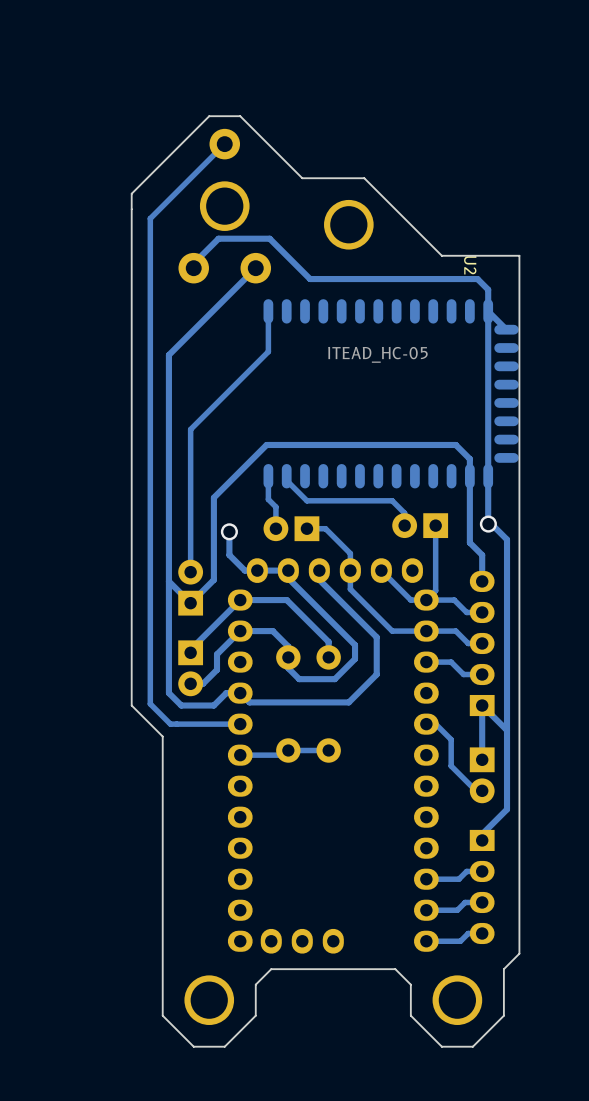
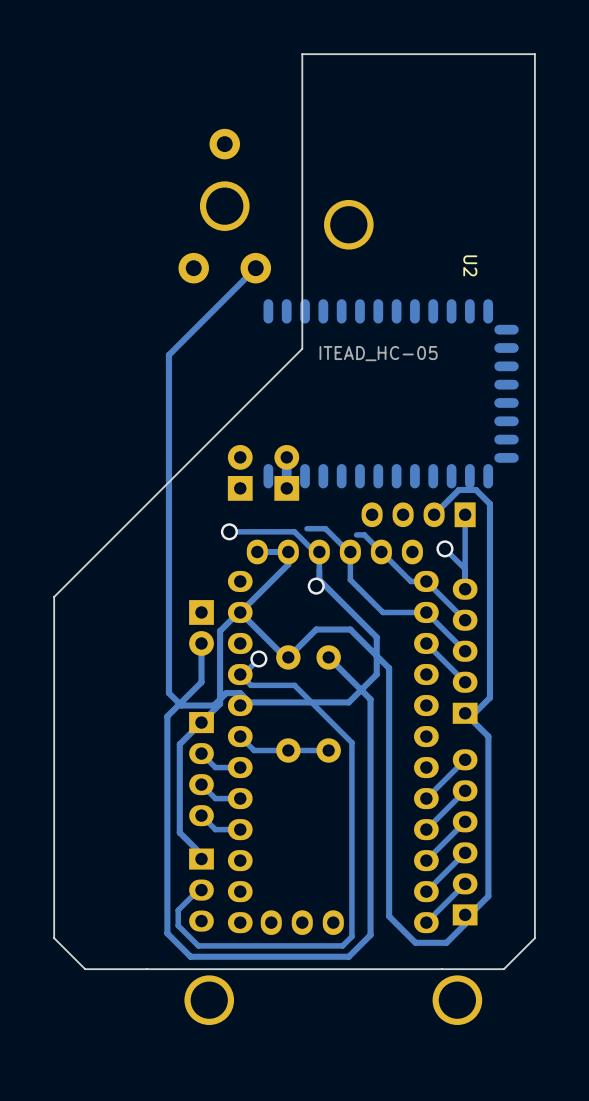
track: (224, 144) (150, 218) (150, 703) (170, 724) (240, 724) -> none
track: (193, 268) (193, 263) (218, 238) (269, 238) (310, 279) (477, 279) (488, 289) (488, 523) (491, 524) (507, 539) (507, 809) (482, 834) (482, 840) -> none
track: (268, 311) (268, 351) (190, 429) (190, 572) -> none
track: (488, 311) (506, 329) -> none
part: none -> (240, 472)
part: none -> (286, 472)
track: (268, 476) (268, 499) (275, 507) (275, 528) -> none
track: (286, 476) (286, 480) (306, 500) (392, 500) (404, 513) (404, 525) -> none
part footprint: [392, 513, 449, 539] -> [361, 502, 476, 528]
track: none -> (434, 514) (458, 489) (475, 489) (489, 503) (489, 697) (474, 713) (465, 713) (488, 736) (488, 896) (469, 914) (465, 914) (465, 924) (446, 942) (415, 942) (389, 916) (389, 668) (350, 629) (316, 629) (288, 657) (285, 657) (240, 612) (288, 564) (288, 551) (257, 551)
track: none -> (465, 514) (465, 589)
via position: (488, 524) -> (444, 548)
track: (435, 525) (435, 590) (426, 600) -> none
part: (291, 528) -> none
track: none -> (226, 531) (294, 531) (314, 551) (319, 551) (319, 570)
track: (229, 531) (229, 555) (244, 570) (288, 570) (288, 578) (355, 645) (355, 659) (334, 679) (299, 679) (288, 668) (288, 646) (272, 631) (240, 631) (217, 654) (217, 669) (203, 683) (190, 683) -> none
track: none -> (356, 534) (364, 534) (410, 581) (426, 581) (465, 620)
track: none -> (444, 548) (465, 569)
track: (381, 570) (410, 600) (454, 600) (466, 612) (482, 612) -> none
track: (350, 579) (350, 589) (392, 631) (455, 631) (468, 643) (482, 643) -> (350, 579) (382, 612) (426, 612) (465, 651)
track: (482, 581) (482, 555) (469, 542) (469, 459) (455, 444) (266, 444) (213, 497) (213, 579) (190, 603) (168, 581) -> none
via: none -> (316, 586)
part: (190, 587) -> none
track: none -> (238, 612) (220, 631) (220, 703) (179, 744) (179, 832) (201, 854) (201, 859)
part: none -> (201, 627)
track: none -> (426, 643) (465, 682)
part position: (482, 643) -> (465, 651)
track: (190, 652) (190, 649) (240, 600) (286, 600) (328, 641) (328, 657) -> (201, 643) (201, 682) (167, 716) (167, 933) (190, 956) (348, 956) (370, 935) (370, 699) (328, 657)
track: none -> (258, 659) (243, 674) (240, 674) (251, 685) (294, 685) (351, 742) (351, 936) (342, 945) (198, 945) (178, 925) (178, 910) (198, 890) (201, 890)
via: none -> (258, 659)
track: (426, 662) (451, 662) (463, 674) (482, 674) -> none
part: (190, 668) -> none
track: (426, 724) (435, 724) (451, 739) (451, 766) (475, 790) (482, 790) -> none
track: (507, 730) (482, 705) (482, 759) -> none
track: (288, 750) (283, 755) (240, 755) -> (288, 750) (254, 750) (240, 736)
track: none -> (201, 753) (215, 767) (240, 767)
part position: (333, 755) -> (333, 737)
track: none -> (465, 759) (426, 798)
part: (482, 775) -> none
track: none -> (201, 784) (215, 798) (240, 798)
track: none -> (465, 790) (426, 829)
track: none -> (201, 815) (215, 829) (240, 829)
track: none -> (465, 821) (426, 860)
part: none -> (465, 837)
track: none -> (465, 852) (426, 891)
track: (482, 871) (466, 871) (458, 879) (426, 879) -> none
track: none -> (465, 883) (426, 922)
part position: (482, 886) -> (201, 769)
part: none -> (201, 890)
track: (482, 902) (465, 902) (457, 910) (426, 910) -> none
track: (482, 933) (468, 933) (460, 941) (426, 941) -> none
board edge: (519, 953) (519, 255) (441, 255) (364, 178) (302, 178) (240, 116) (209, 116) (131, 193) (131, 705) (162, 736) (162, 1015) (193, 1046) (224, 1046) (255, 1015) (255, 984) (271, 969) -> (519, 953) (534, 938) (534, 54) (302, 54) (302, 348) (54, 596) (54, 938) (85, 969) (271, 969)
board edge: (503, 969) (503, 1015) (472, 1046) (441, 1046) (410, 1015) (410, 984) (395, 969) -> (503, 969) (395, 969)

